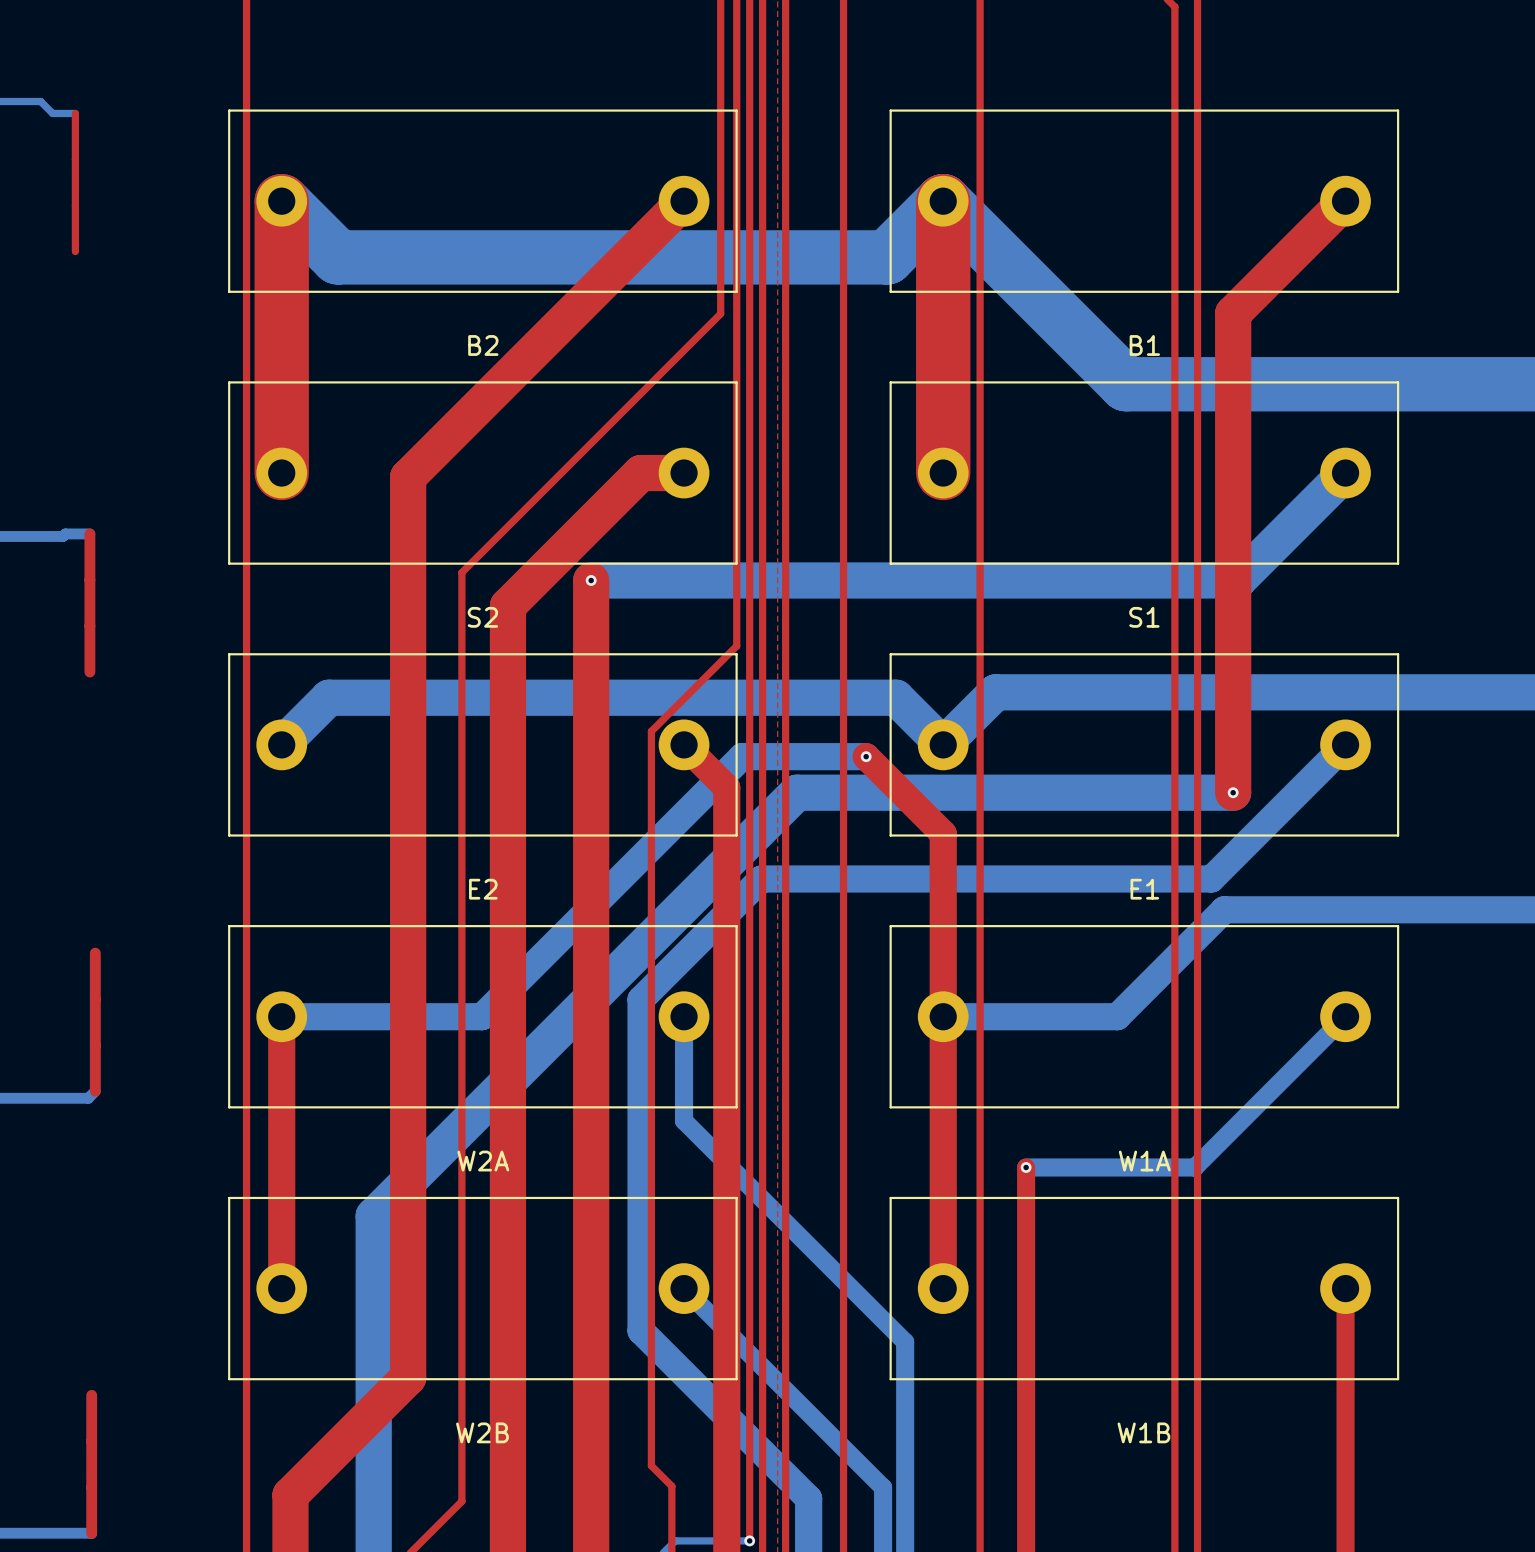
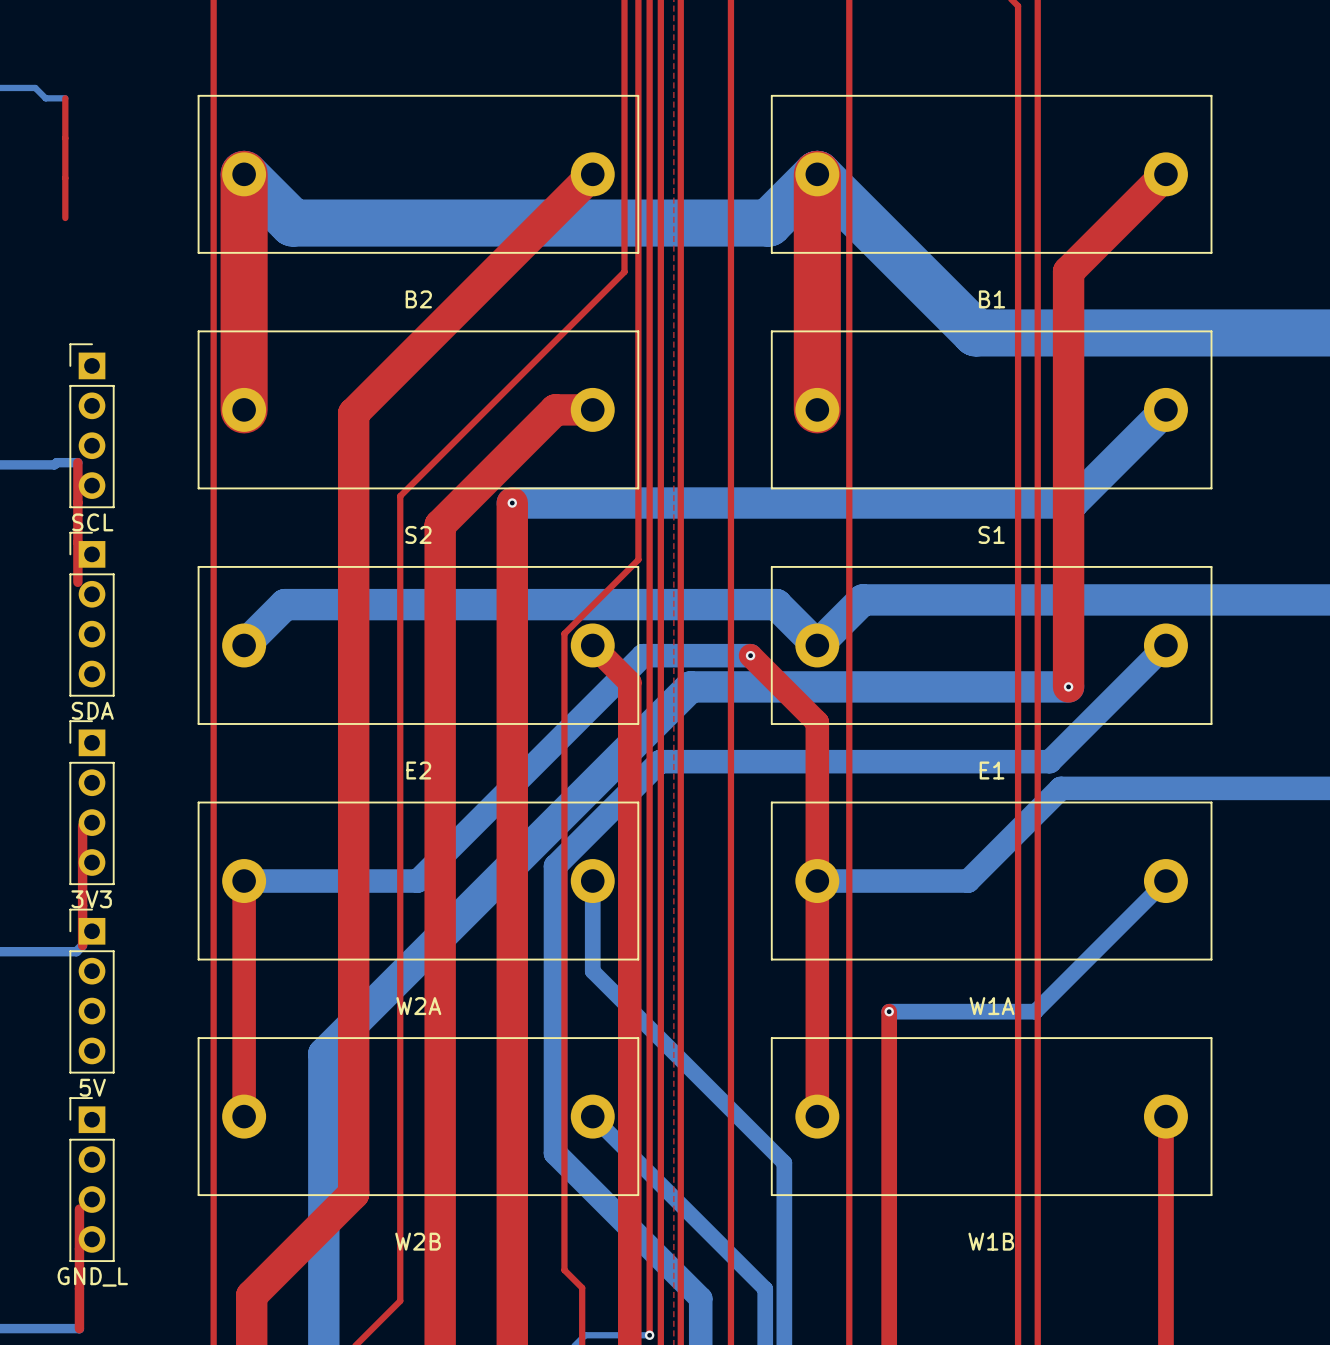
part: none -> SCL (92, 425)
part: none -> SDA (92, 614)
part: none -> 3V3 (92, 802)
part: none -> 5V (92, 991)
part: none -> GND_L (92, 1179)

